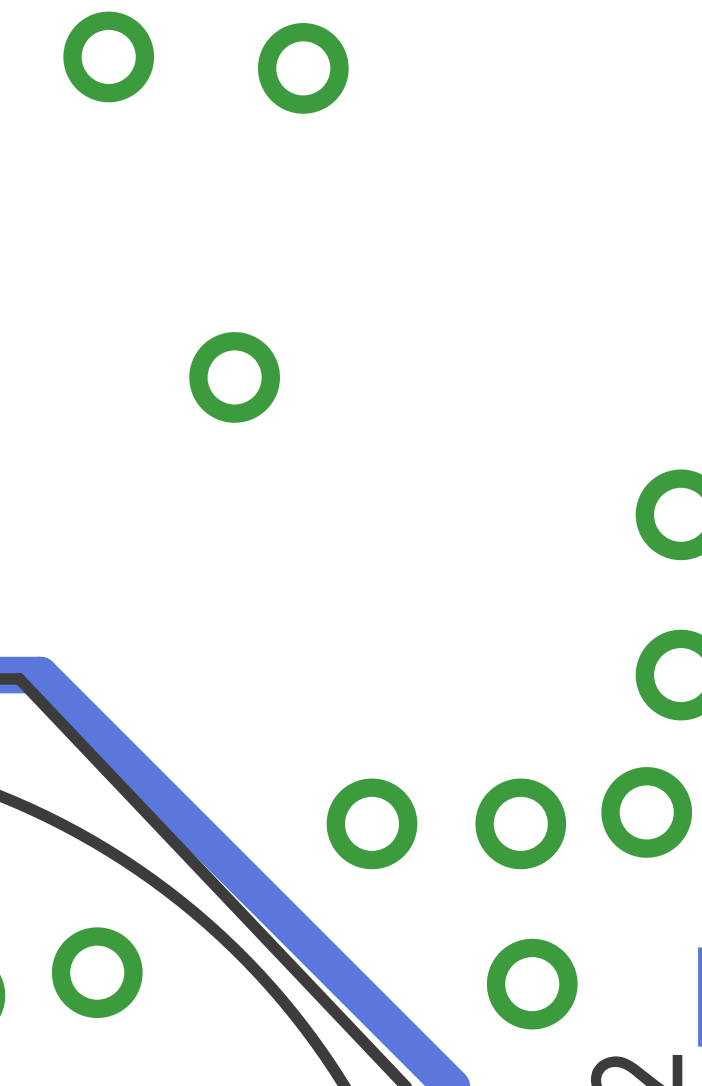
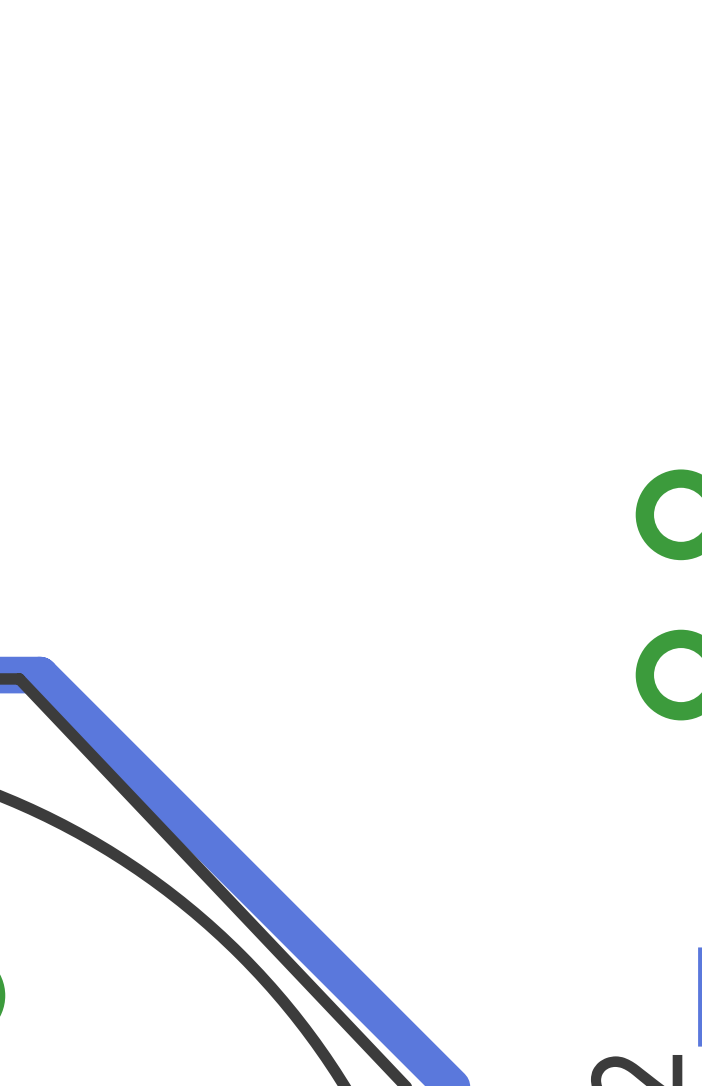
via: (108, 56) -> none
via: (303, 68) -> none
via: (234, 377) -> none
via: (646, 812) -> none
via: (371, 823) -> none
via: (520, 823) -> none
via: (97, 972) -> none
via: (532, 984) -> none

